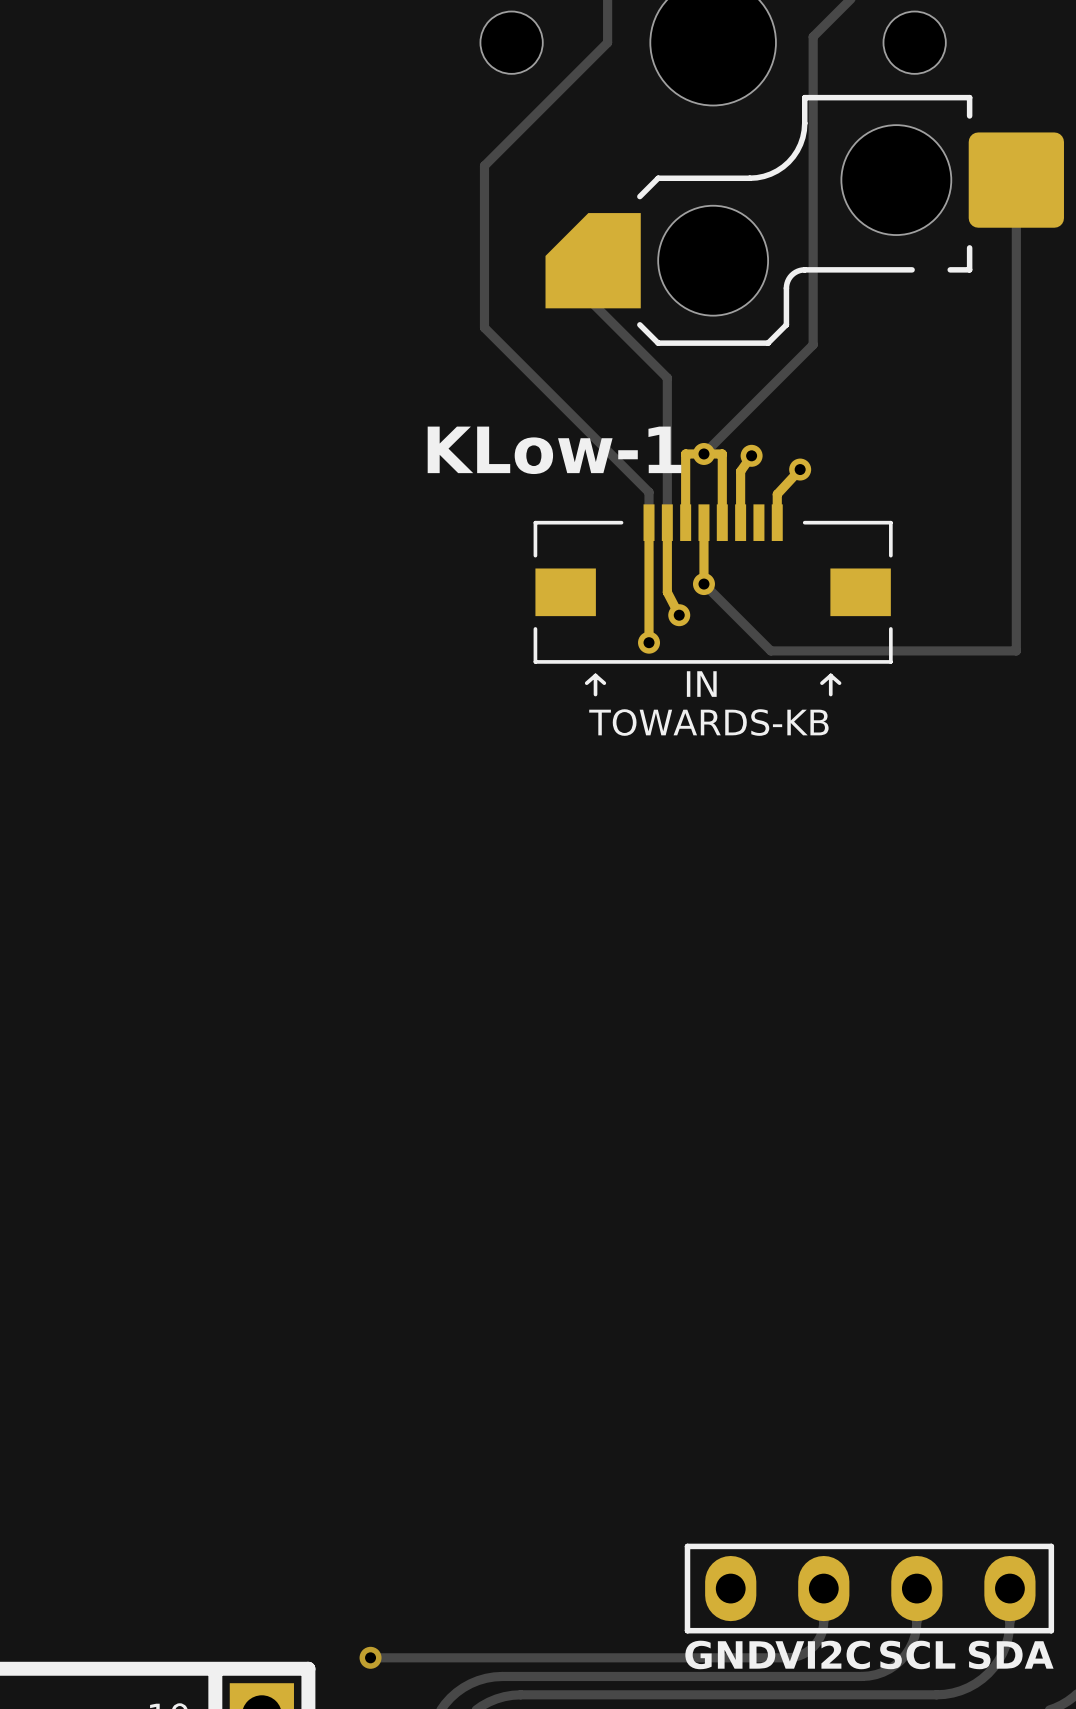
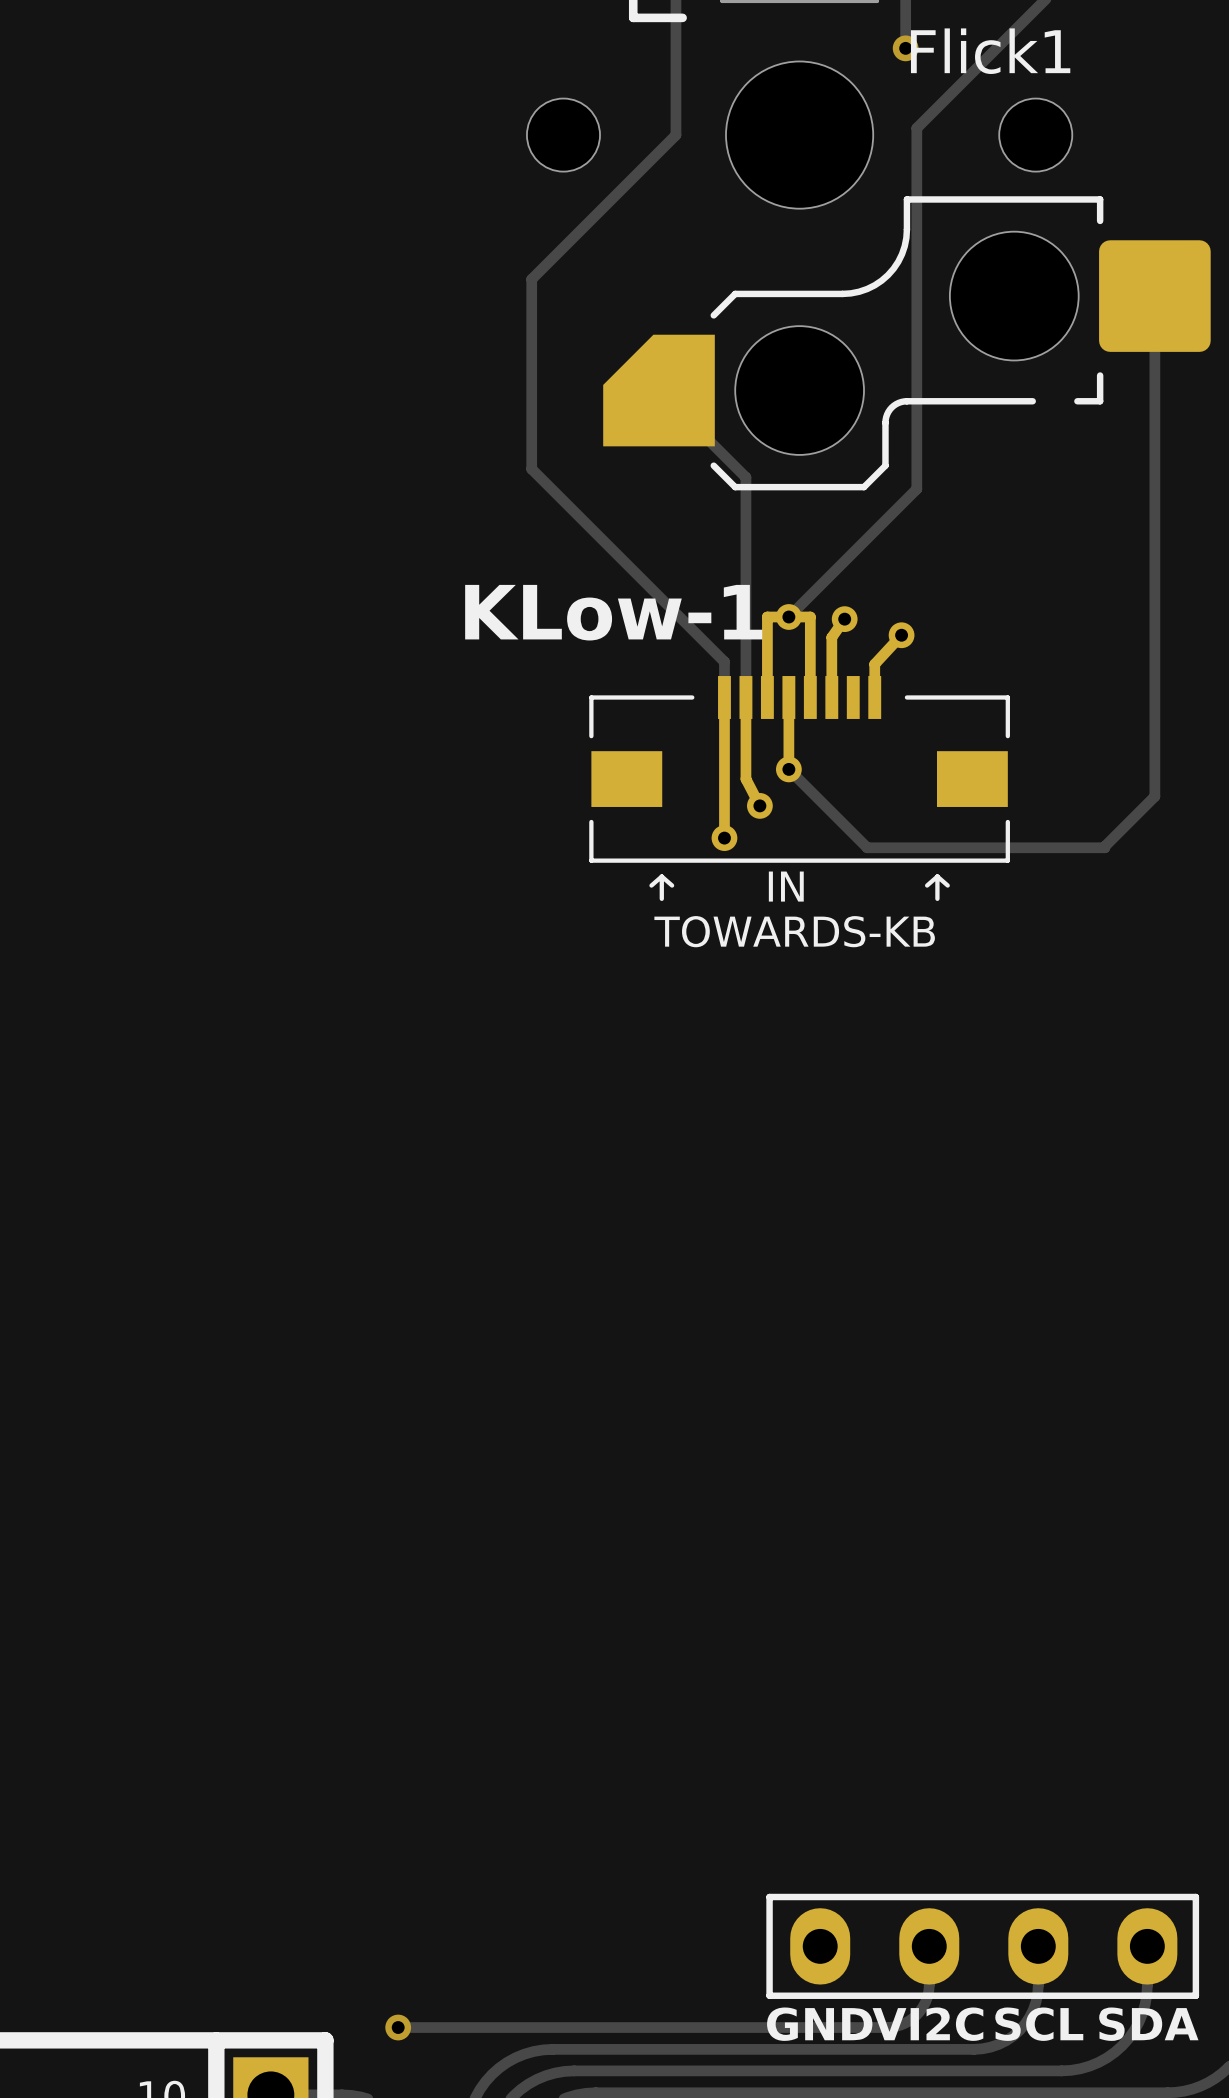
track: (593, 260) (593, 303) (667, 377) -> (659, 390) (745, 477) (745, 527)
track: (1016, 607) (1016, 650) (973, 650) -> (1154, 796) (1104, 847)

